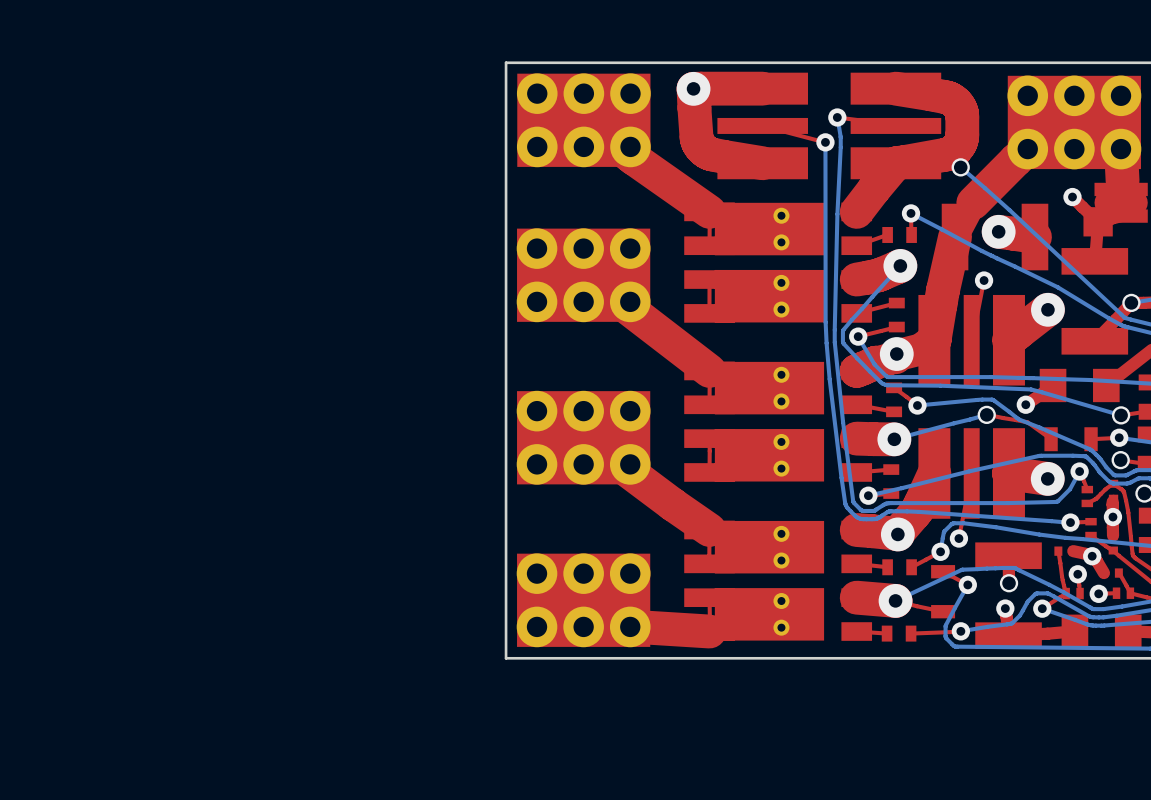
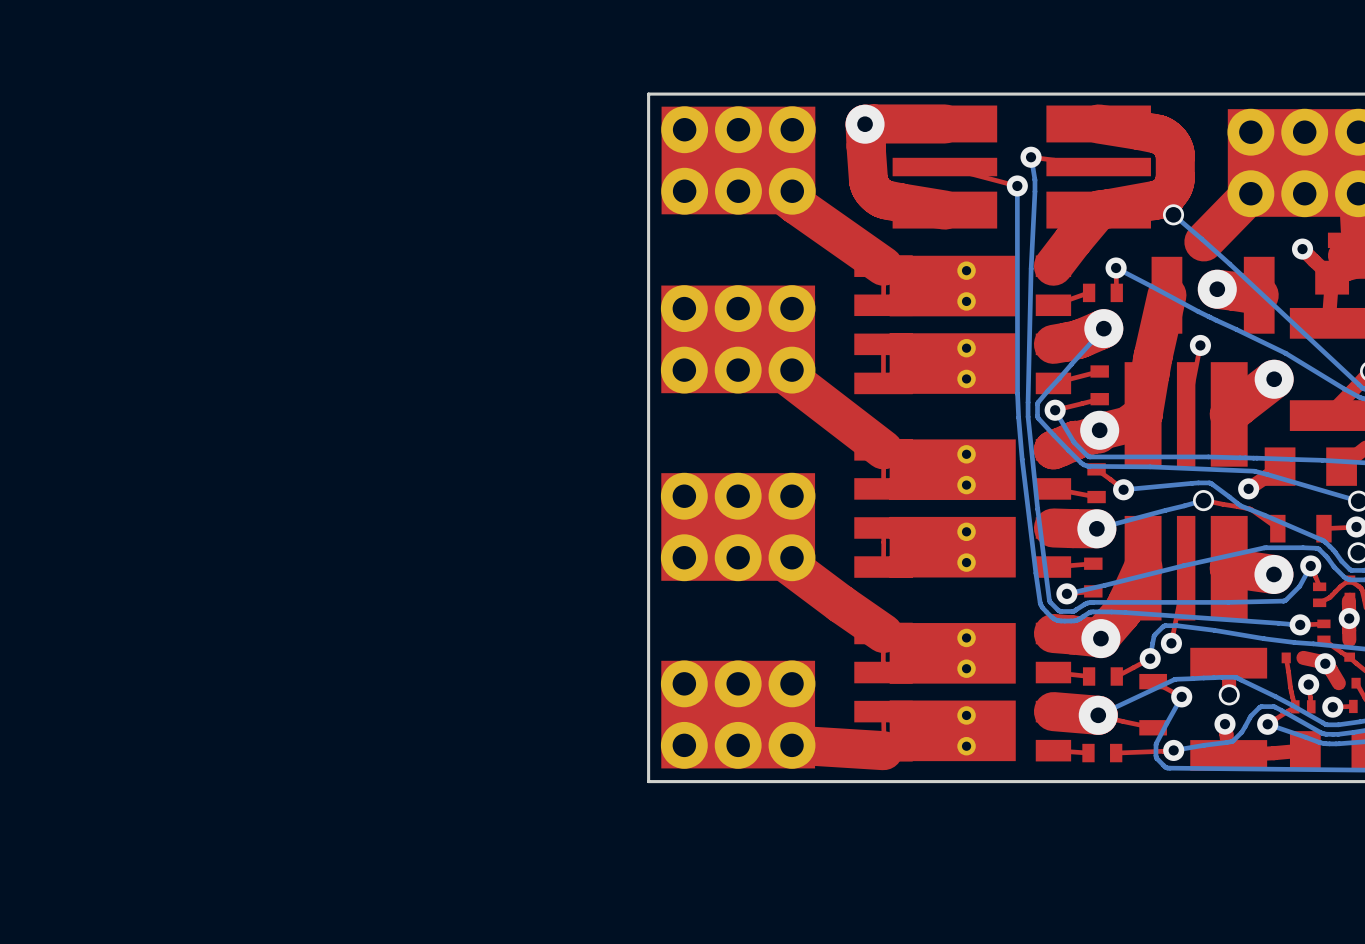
top track: (1027, 149) (973, 202) (955, 237) -> (1250, 193) (1203, 241)

